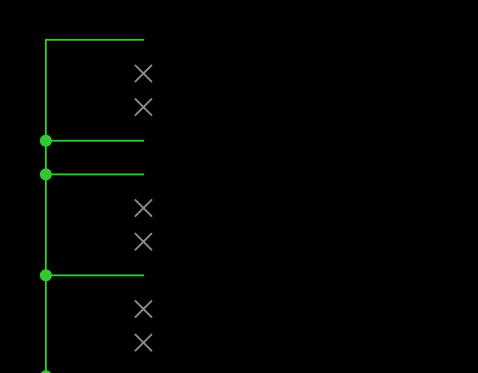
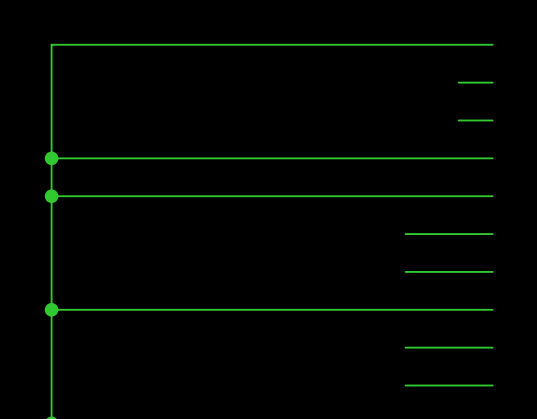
wire: none -> (161, 44) (492, 44)
no-connect mark: (143, 73) -> none
wire: none -> (458, 82) (492, 82)
no-connect mark: (143, 107) -> none
wire: none -> (458, 120) (492, 120)
wire: none -> (161, 158) (492, 158)
wire: none -> (161, 196) (492, 196)
no-connect mark: (143, 208) -> none
wire: none -> (405, 234) (492, 234)
no-connect mark: (143, 241) -> none
wire: none -> (405, 271) (492, 271)
wire: none -> (161, 309) (492, 309)
no-connect mark: (143, 308) -> none
wire: none -> (405, 347) (492, 347)
no-connect mark: (143, 342) -> none
wire: none -> (405, 385) (492, 385)

